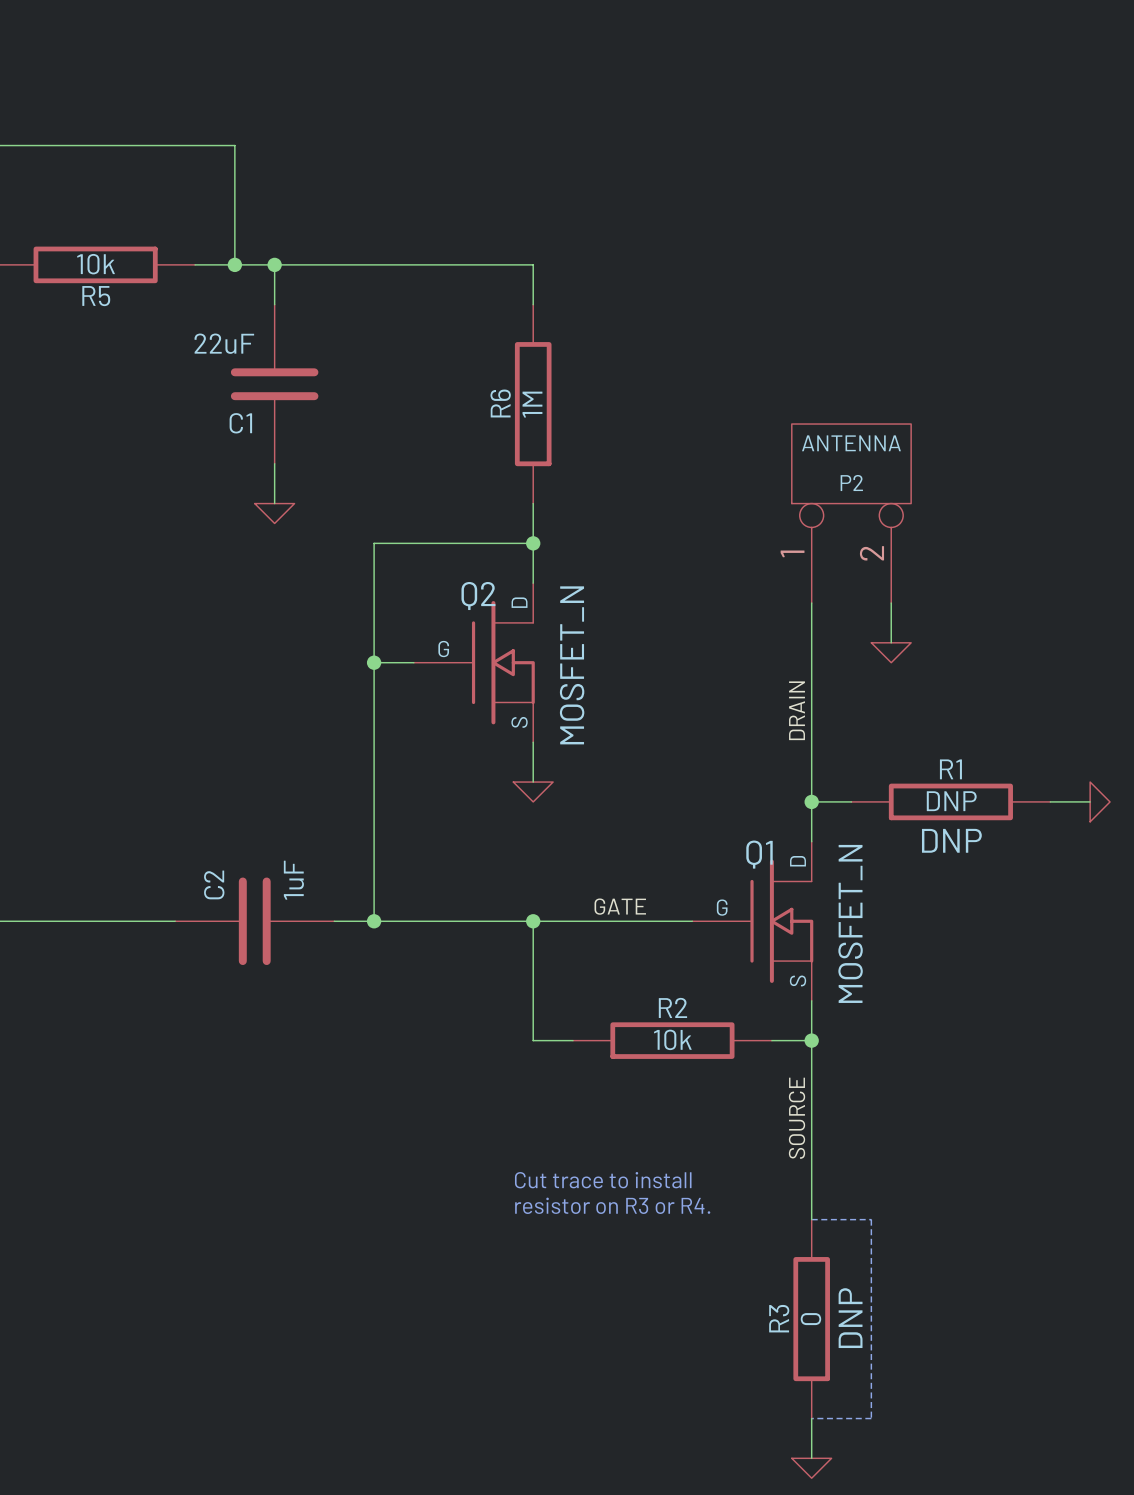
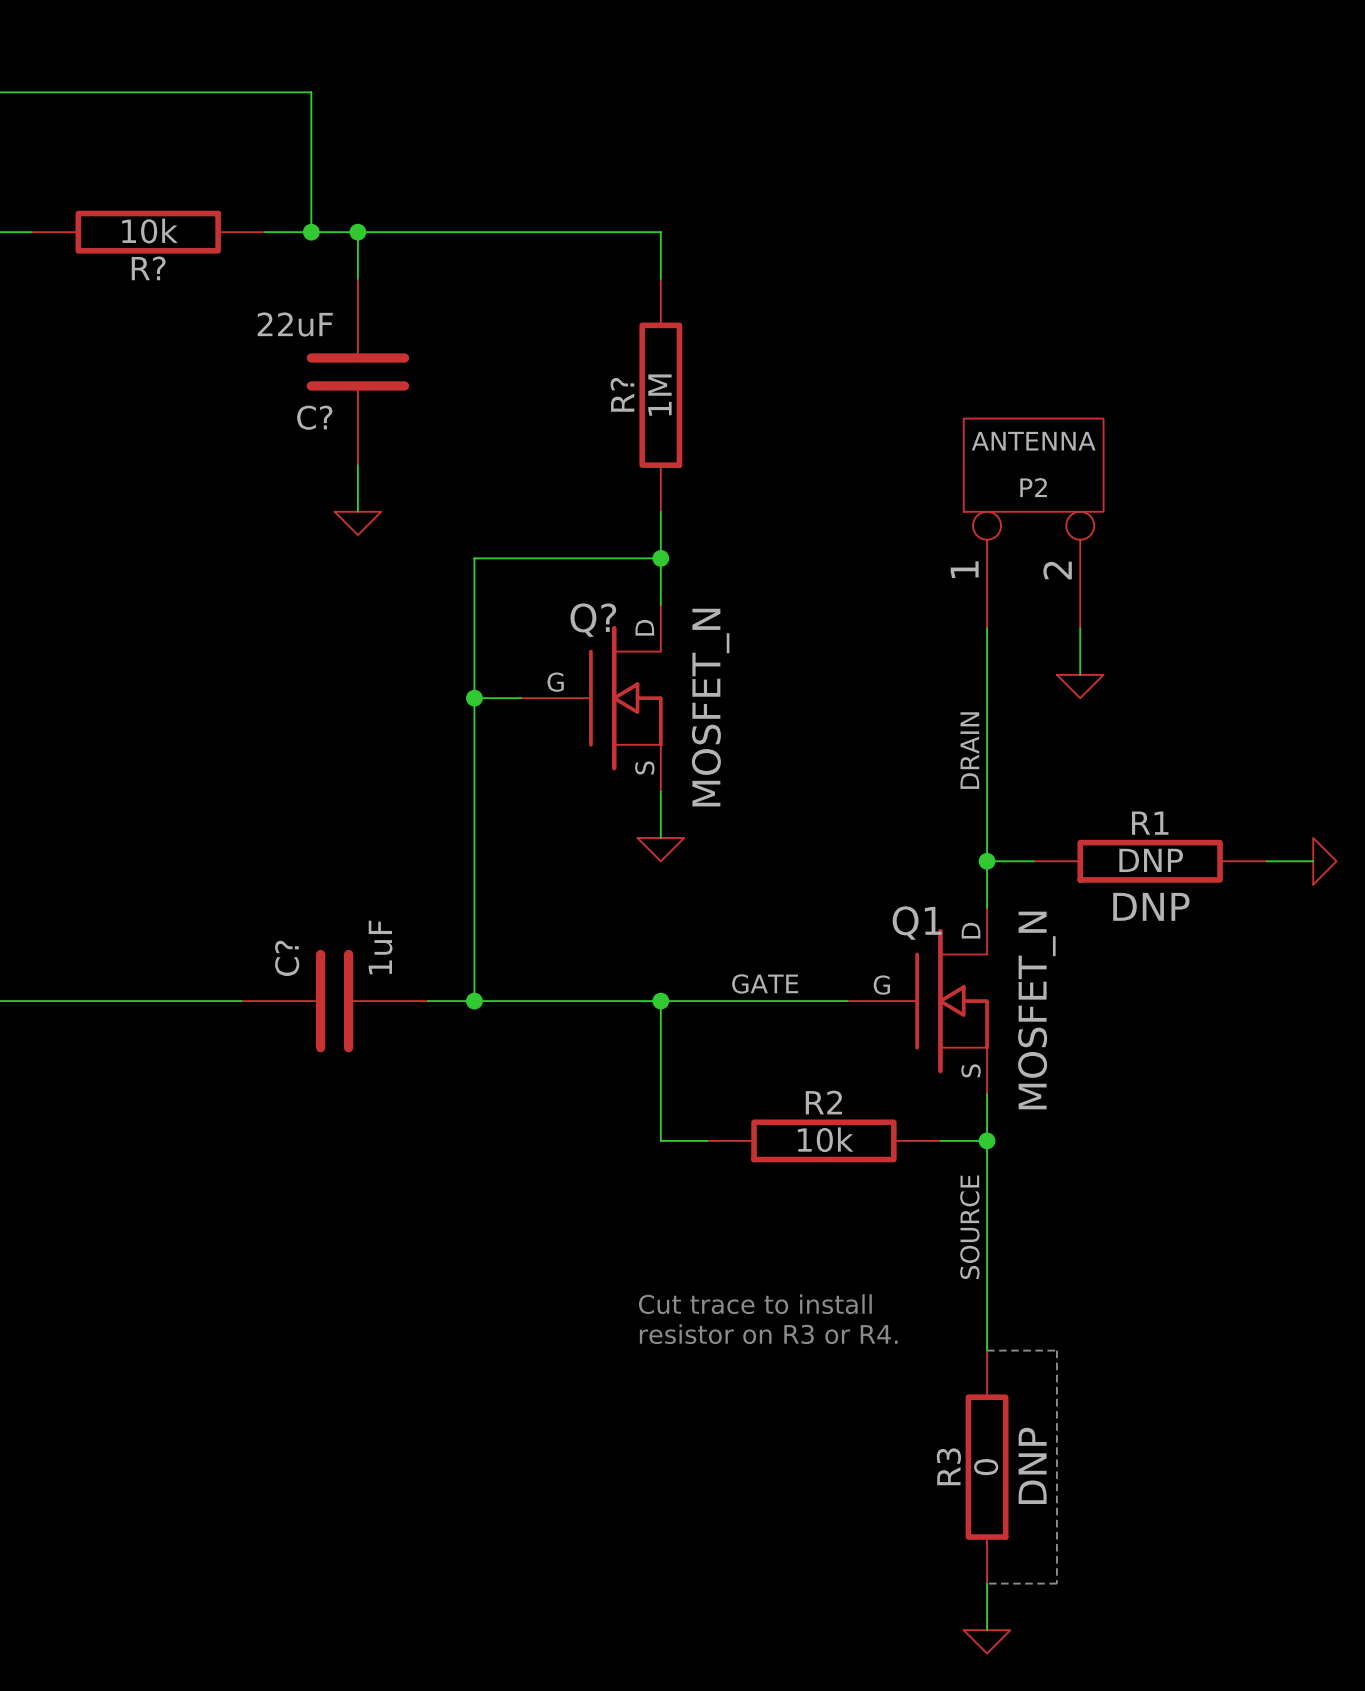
R5 name: R5 (96, 296) -> R? (148, 268)
R6 name: R6 (500, 403) -> R? (622, 394)
C1 name: C1 (240, 423) -> C? (314, 417)
Q2 name: Q2 (478, 596) -> Q? (593, 620)
C2 name: C2 (214, 884) -> C? (287, 958)

